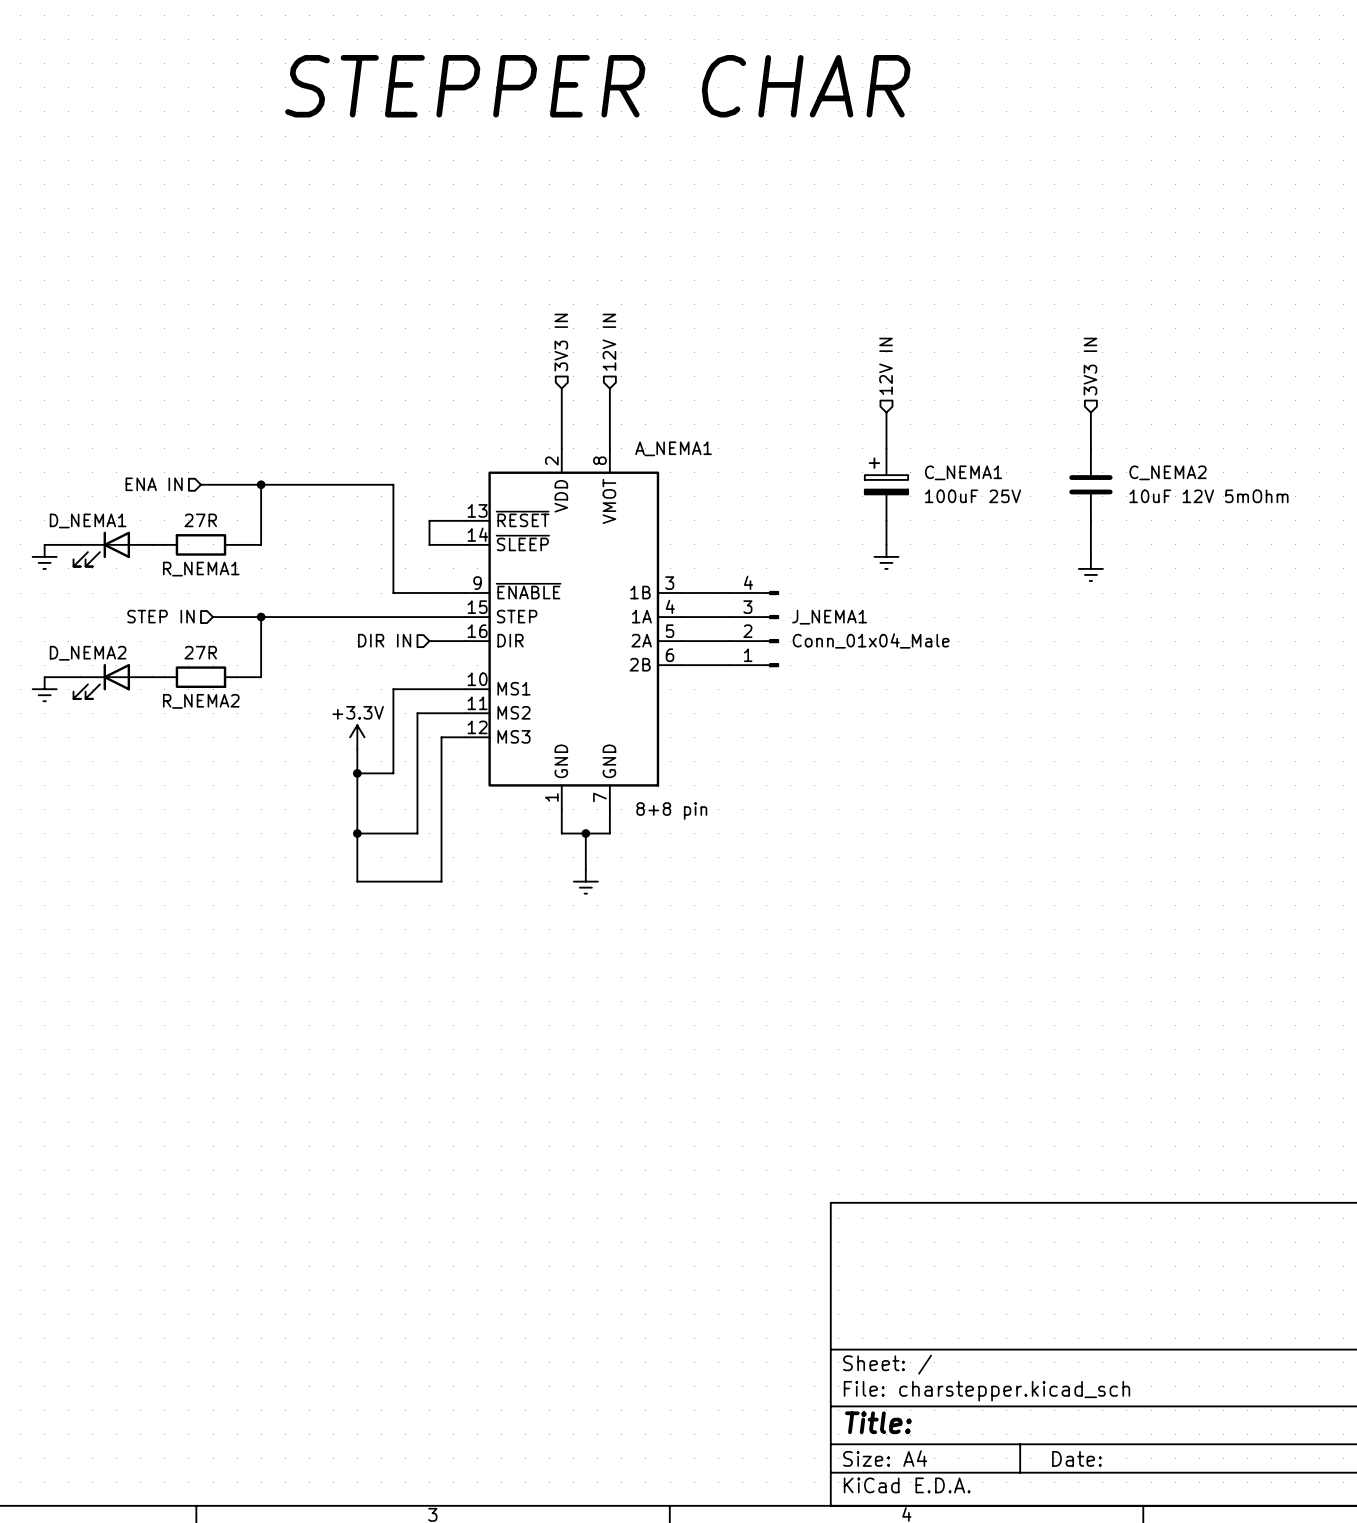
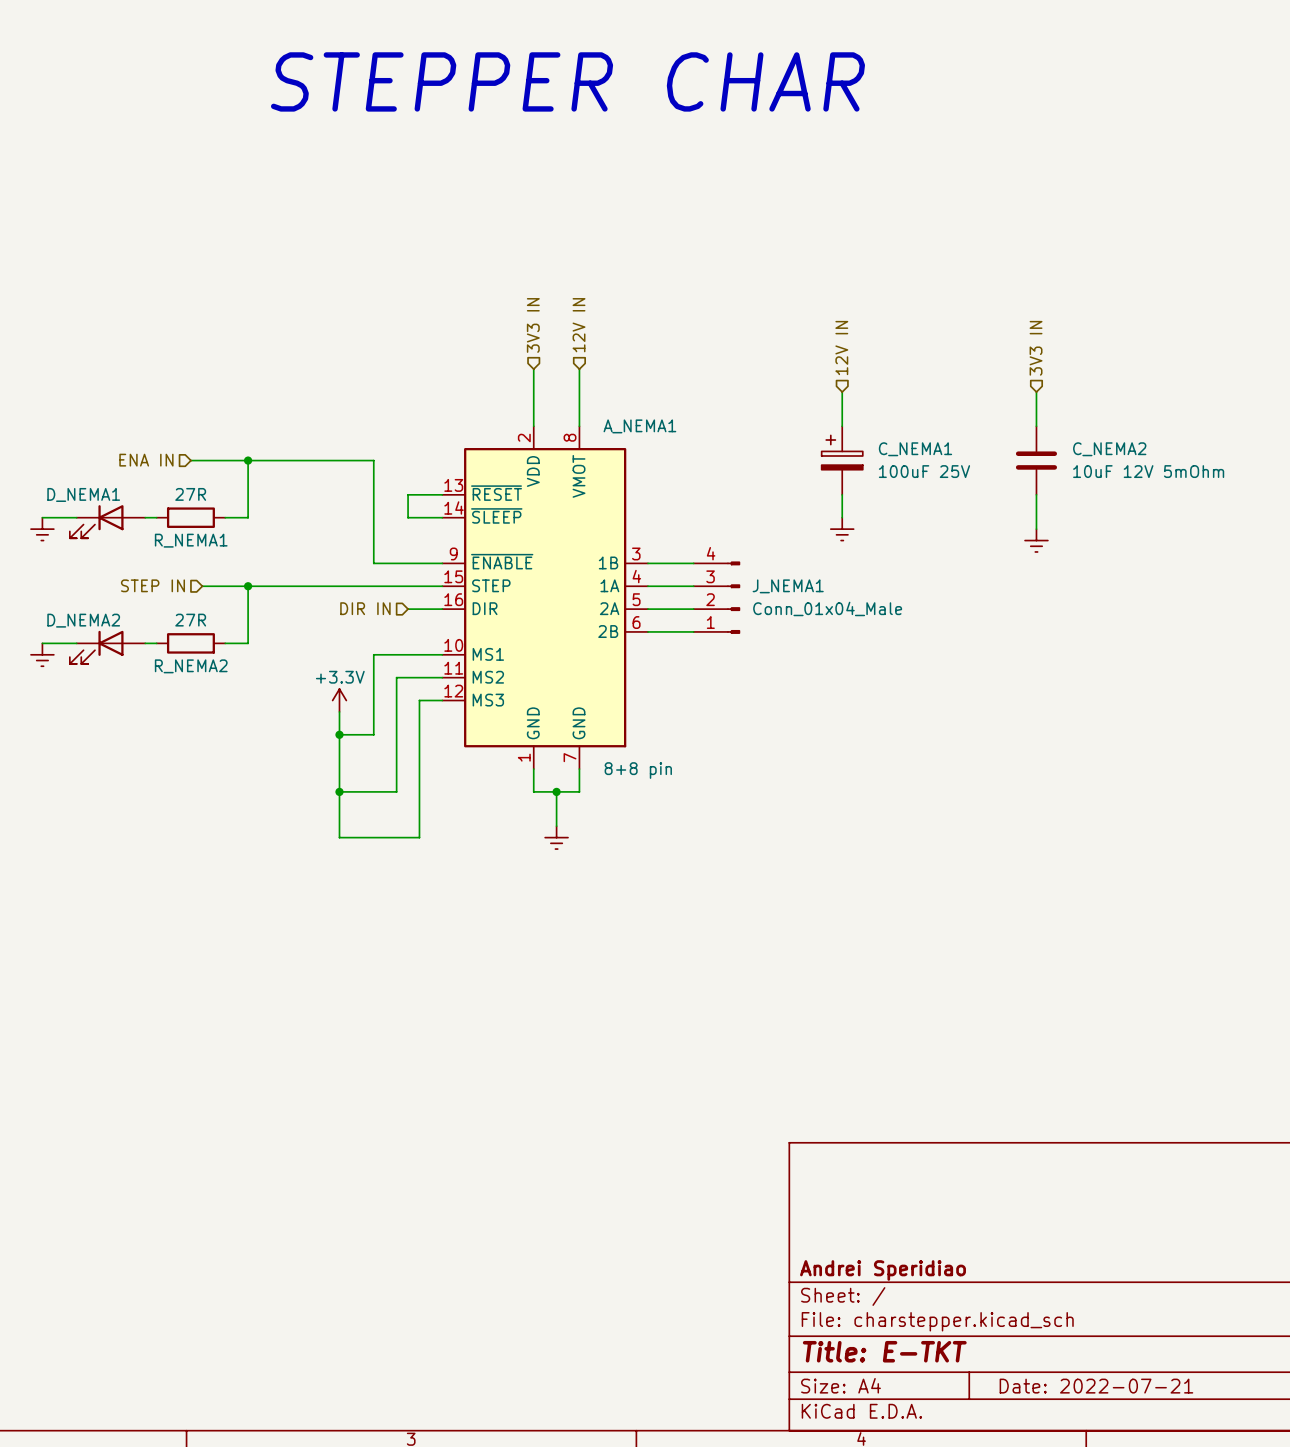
title block: none -> Andrei Speridiao (883, 1270)
title block: Title: (878, 1422) -> Title: E-TKT (884, 1351)
title block: Date: (1076, 1458) -> Date: 2022-07-21 (1096, 1386)

